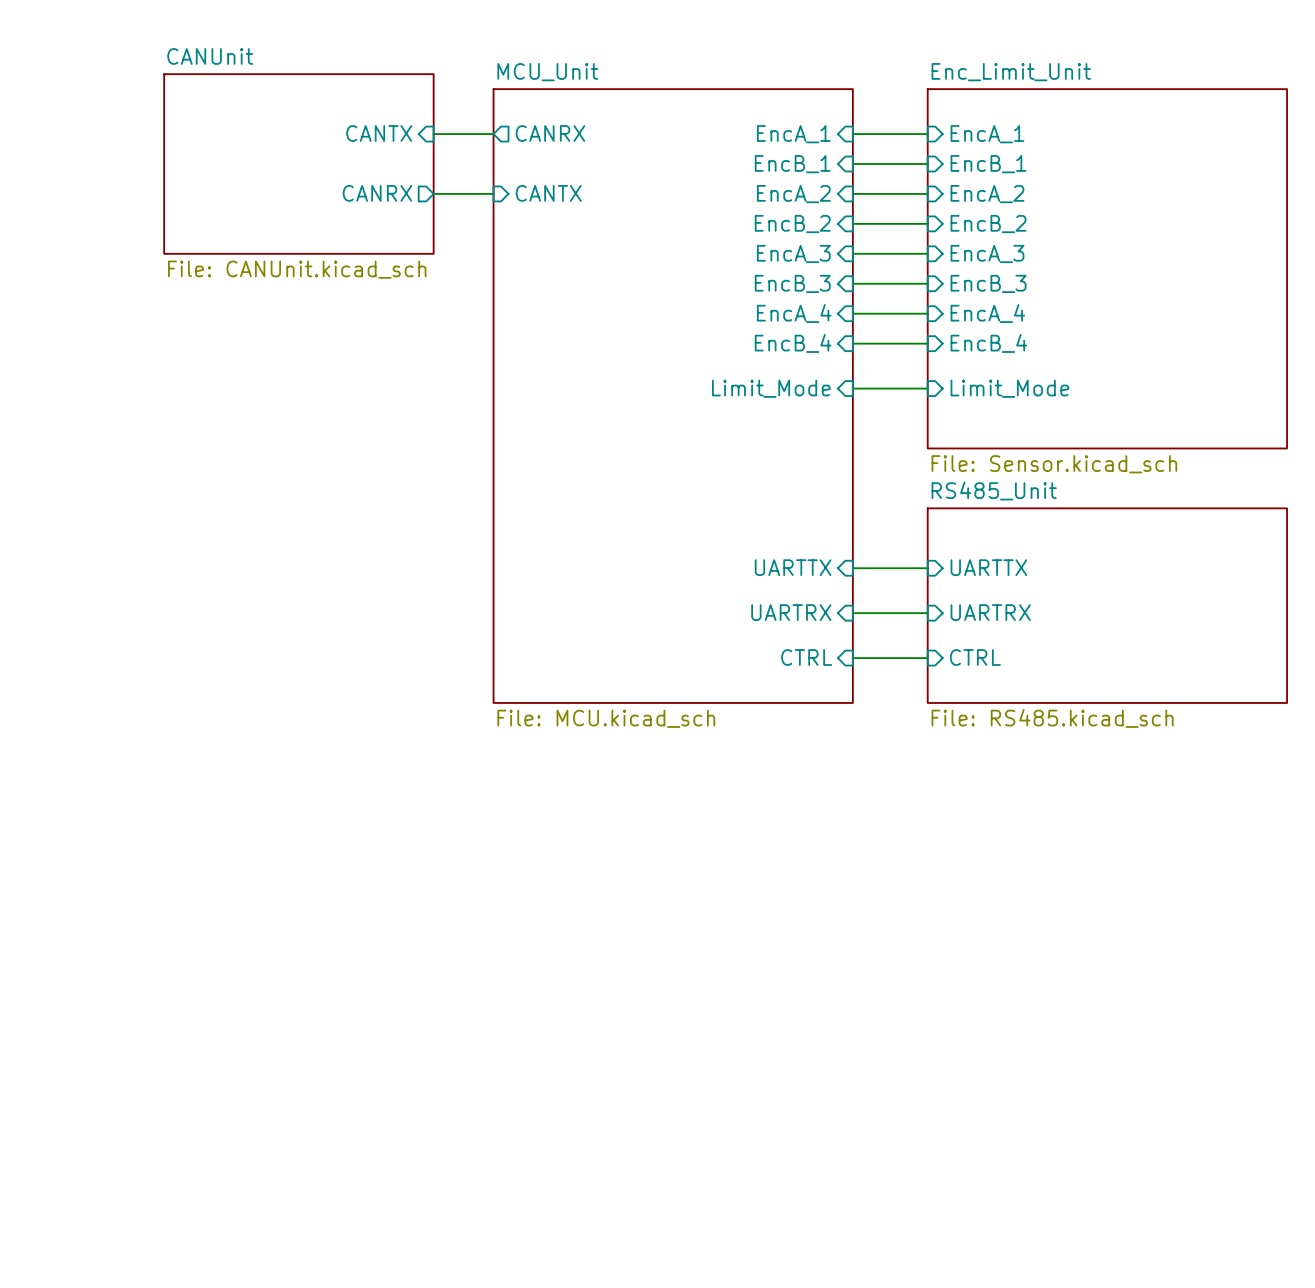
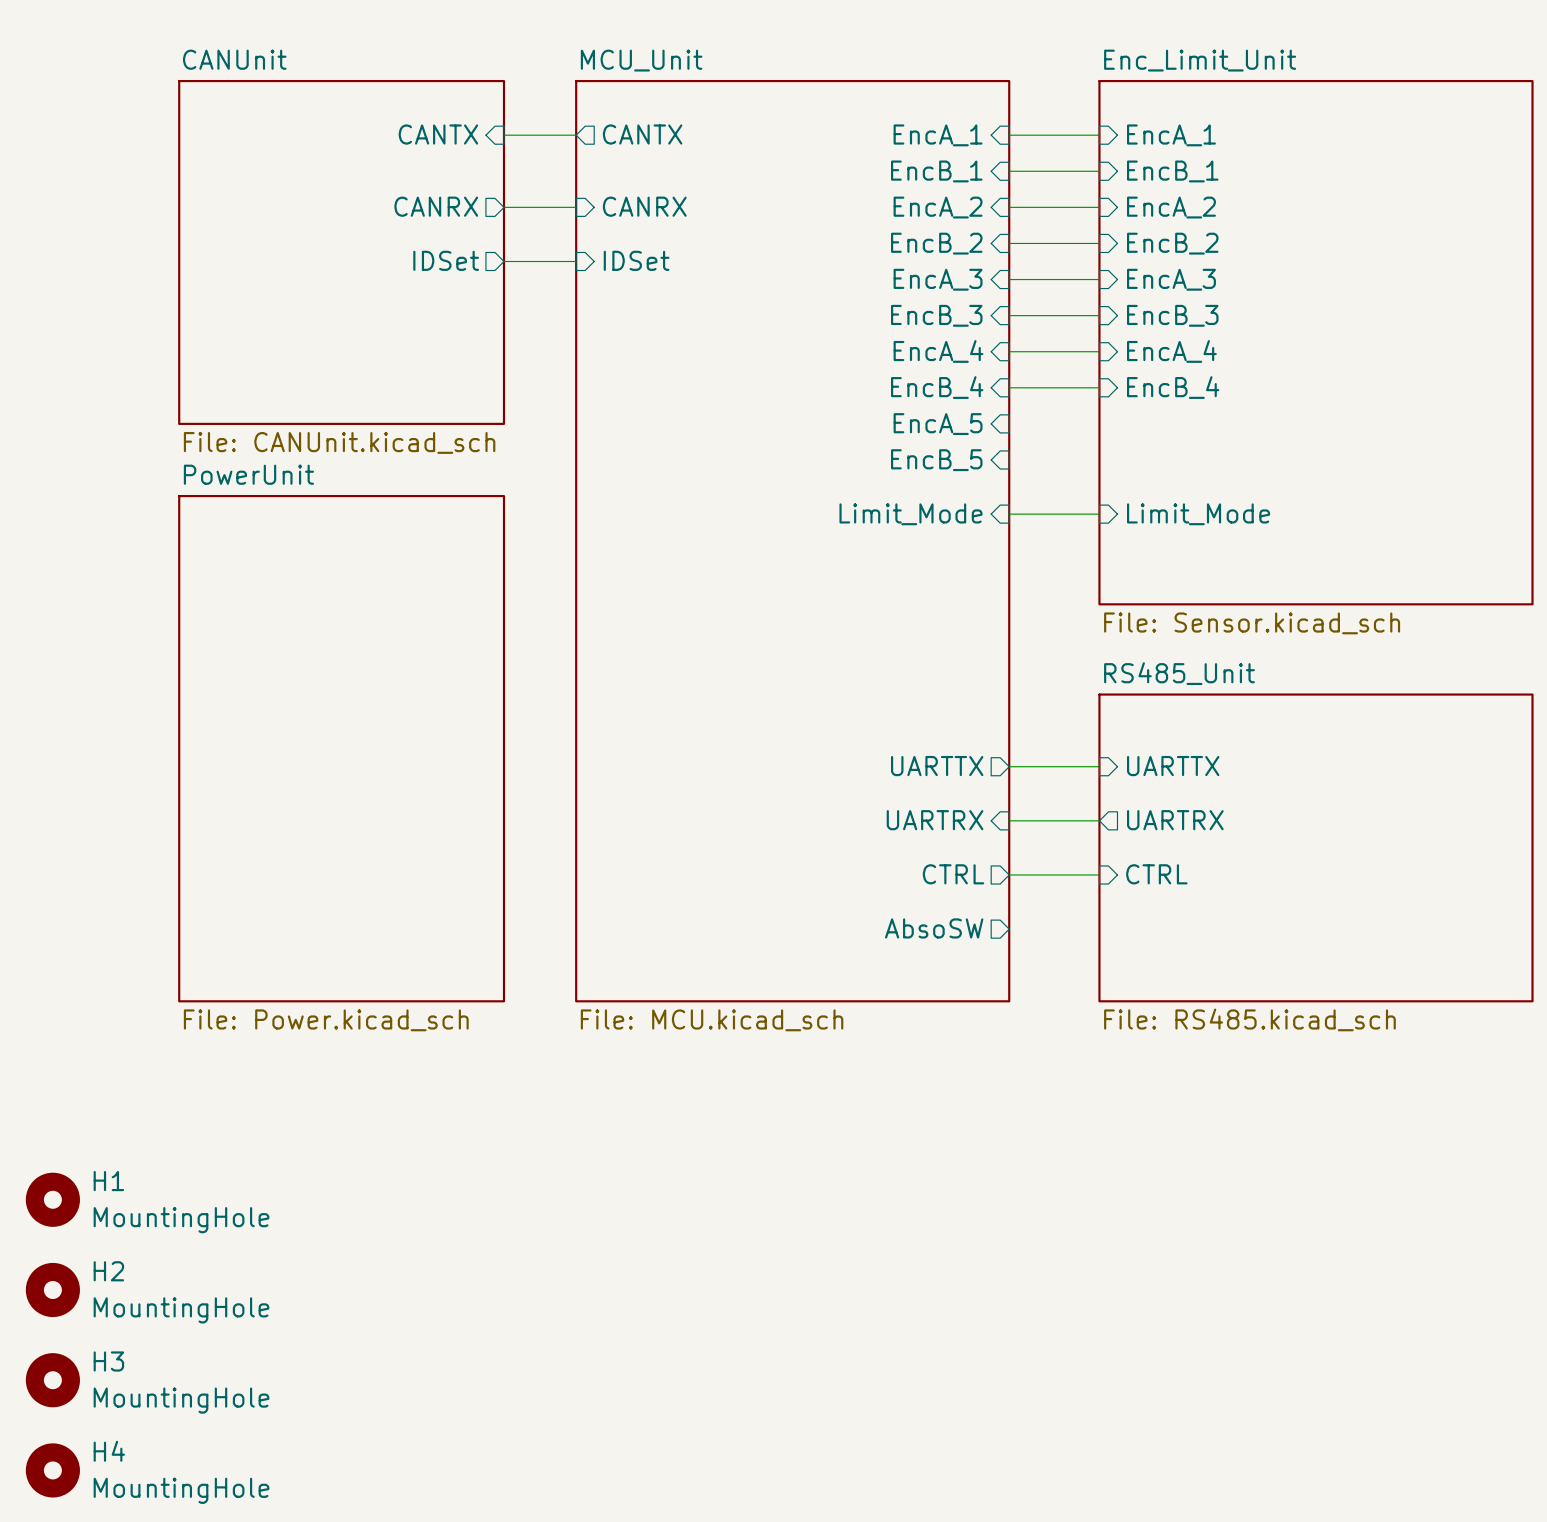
sheet pin: CANRX (550, 133) -> CANTX (642, 134)
sheet CANUnit: File: CANUnit.kicad_sch (298, 164) -> none
sheet pin: CANTX (548, 193) -> CANRX (644, 206)
sheet CANUnit: none -> File: CANUnit.kicad_sch (341, 252)
sheet pin: none -> IDSet (446, 260)
wire: none -> (504, 261) (576, 261)
sheet pin: none -> IDSet (636, 260)
sheet Enc_Limit_Unit: File: Sensor.kicad_sch (1107, 268) -> none
sheet Enc_Limit_Unit: none -> File: Sensor.kicad_sch (1315, 342)
sheet pin: none -> EncA_5 (938, 424)
sheet pin position: Limit_Mode (771, 388) -> Limit_Mode (910, 514)
wire: (852, 388) (927, 388) -> (1009, 514) (1099, 514)
sheet pin position: Limit_Mode (1009, 388) -> Limit_Mode (1198, 514)
sheet MCU_Unit: File: MCU.kicad_sch (673, 396) -> none
sheet pin: none -> EncB_5 (936, 460)
sheet MCU_Unit: none -> File: MCU.kicad_sch (792, 541)
sheet RS485_Unit name position: RS485_Unit (994, 490) -> RS485_Unit (1179, 673)
sheet RS485_Unit shape: [926, 507, 1288, 704] -> [1098, 693, 1534, 1003]
sheet pin: UARTTX (793, 567) -> none
sheet pin: UARTTX (988, 567) -> none
wire: (852, 568) (927, 568) -> (1009, 820) (1099, 820)
sheet pin: UARTRX (791, 612) -> none
sheet pin: UARTRX (990, 612) -> none
wire: (852, 613) (927, 613) -> (1009, 874) (1099, 874)
sheet PowerUnit: none -> File: Power.kicad_sch (341, 748)
sheet pin shape: input (806, 657) -> output (937, 766)
sheet pin: CTRL (806, 657) -> UARTTX (937, 766)
sheet pin: CTRL (975, 657) -> UARTTX (1173, 766)
sheet pin: none -> UARTRX (935, 820)
sheet pin: none -> UARTRX (1175, 820)
sheet RS485_Unit value position: File: RS485.kicad_sch (1052, 718) -> File: RS485.kicad_sch (1249, 1019)
sheet pin: none -> CTRL (953, 874)
sheet pin: none -> CTRL (1156, 874)
sheet pin: none -> AbsoSW (934, 928)
H1: none -> MountingHole (52, 1199)
H2: none -> MountingHole (52, 1290)
H3: none -> MountingHole (52, 1380)
H4: none -> MountingHole (52, 1470)

